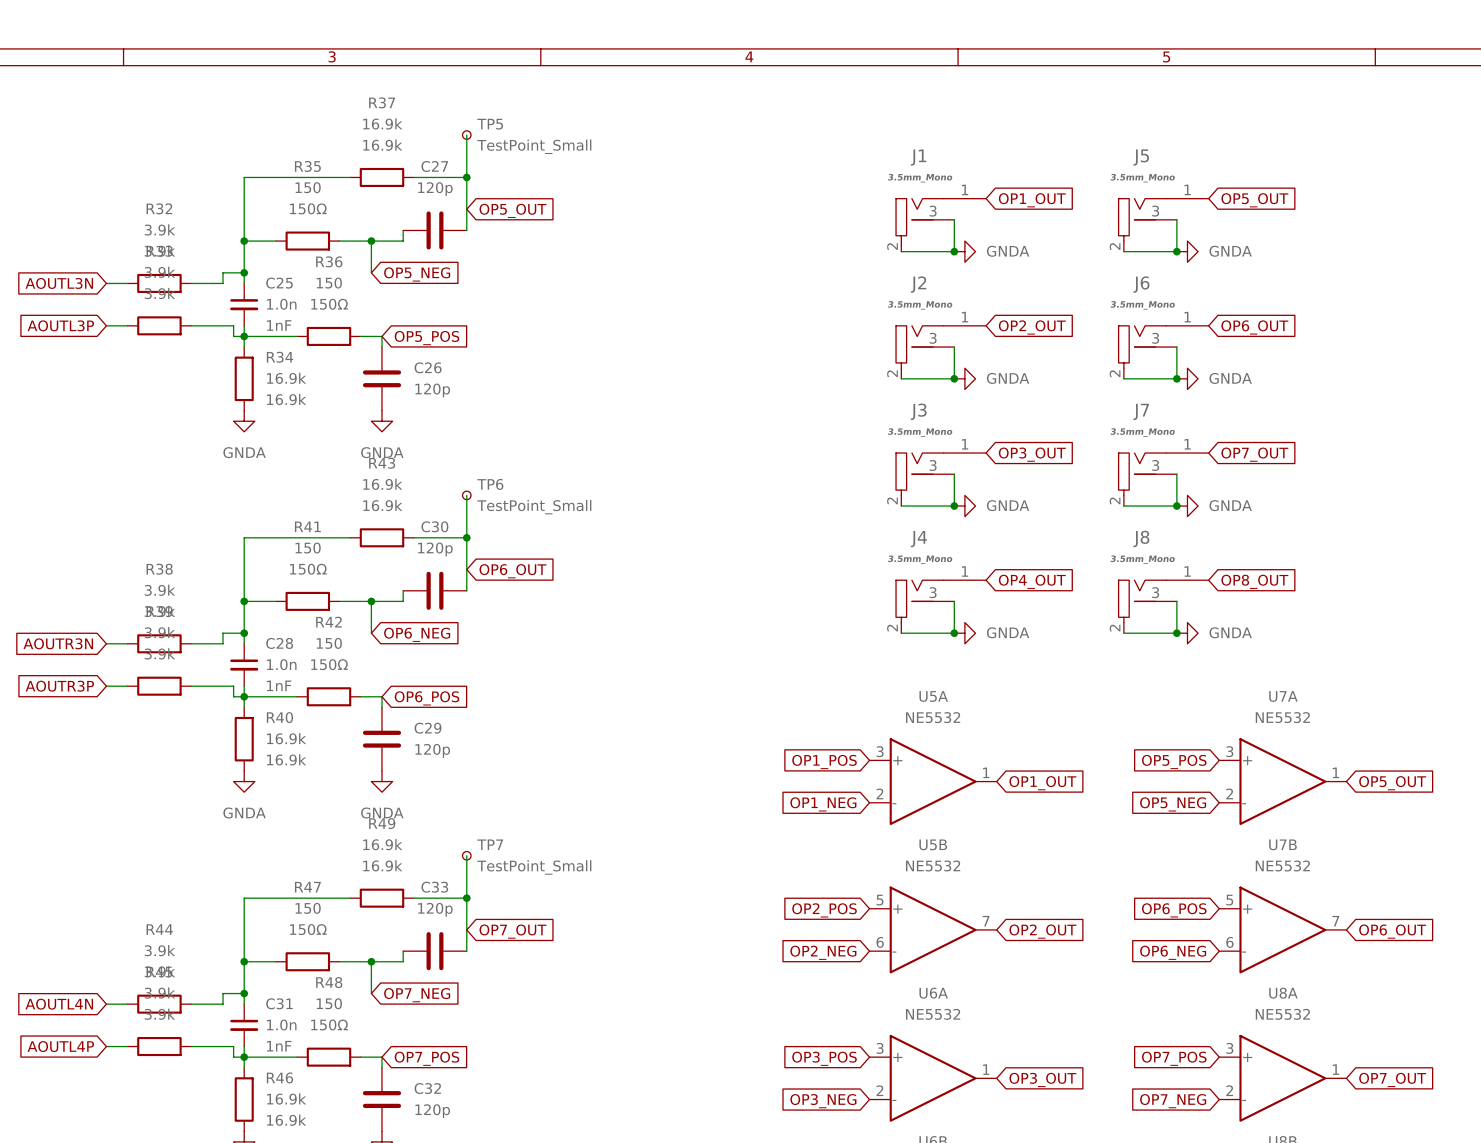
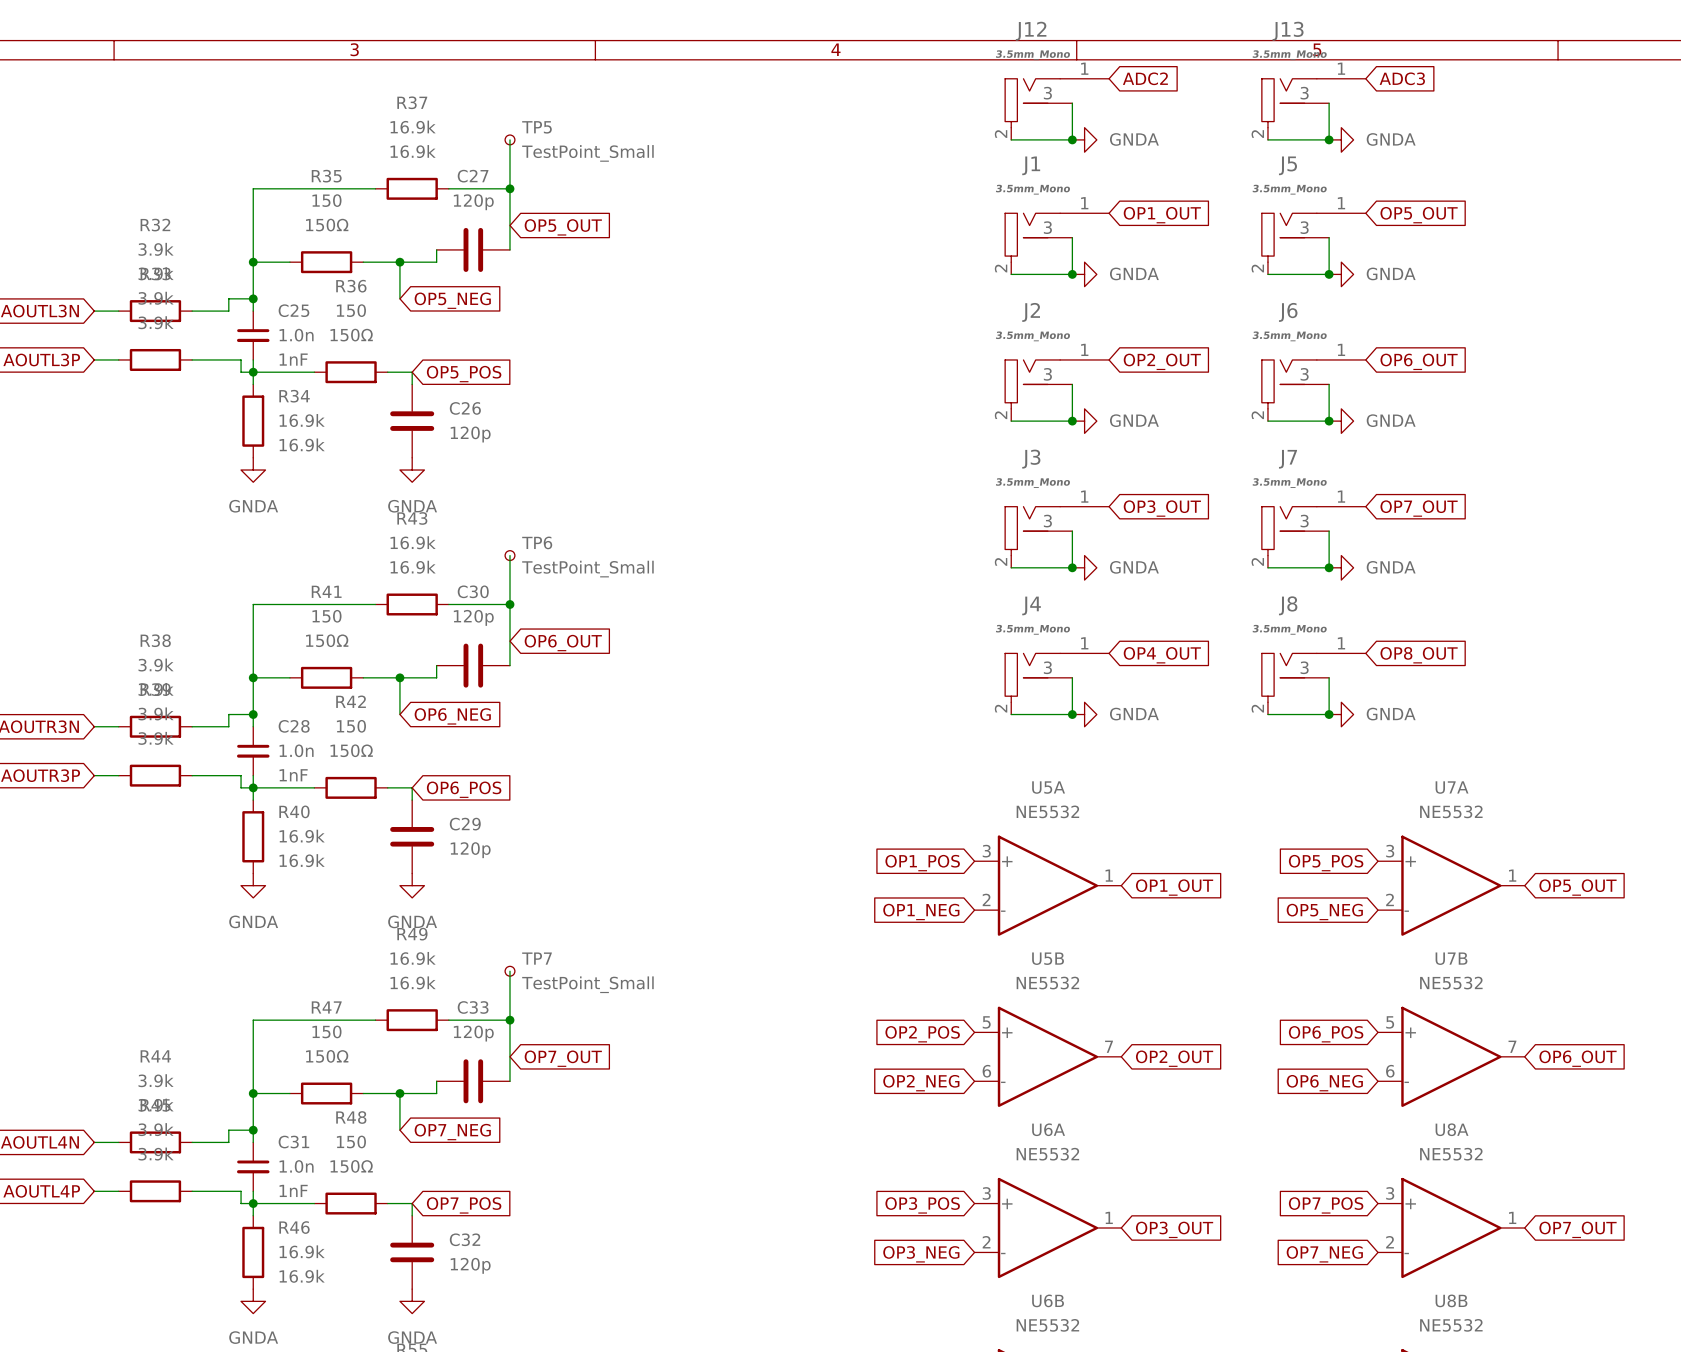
global label: none -> ADC2 (1145, 78)
global label: none -> ADC3 (1402, 78)
wire: none -> (1072, 103) (1072, 139) (1011, 139)
wire: none -> (1329, 103) (1329, 139) (1267, 139)
J12: none -> (1057, 109)
J13: none -> (1313, 109)
junction: none -> (1072, 139)
power symbol: none -> GNDA (1084, 139)
junction: none -> (1329, 139)
power symbol: none -> GNDA (1341, 139)

